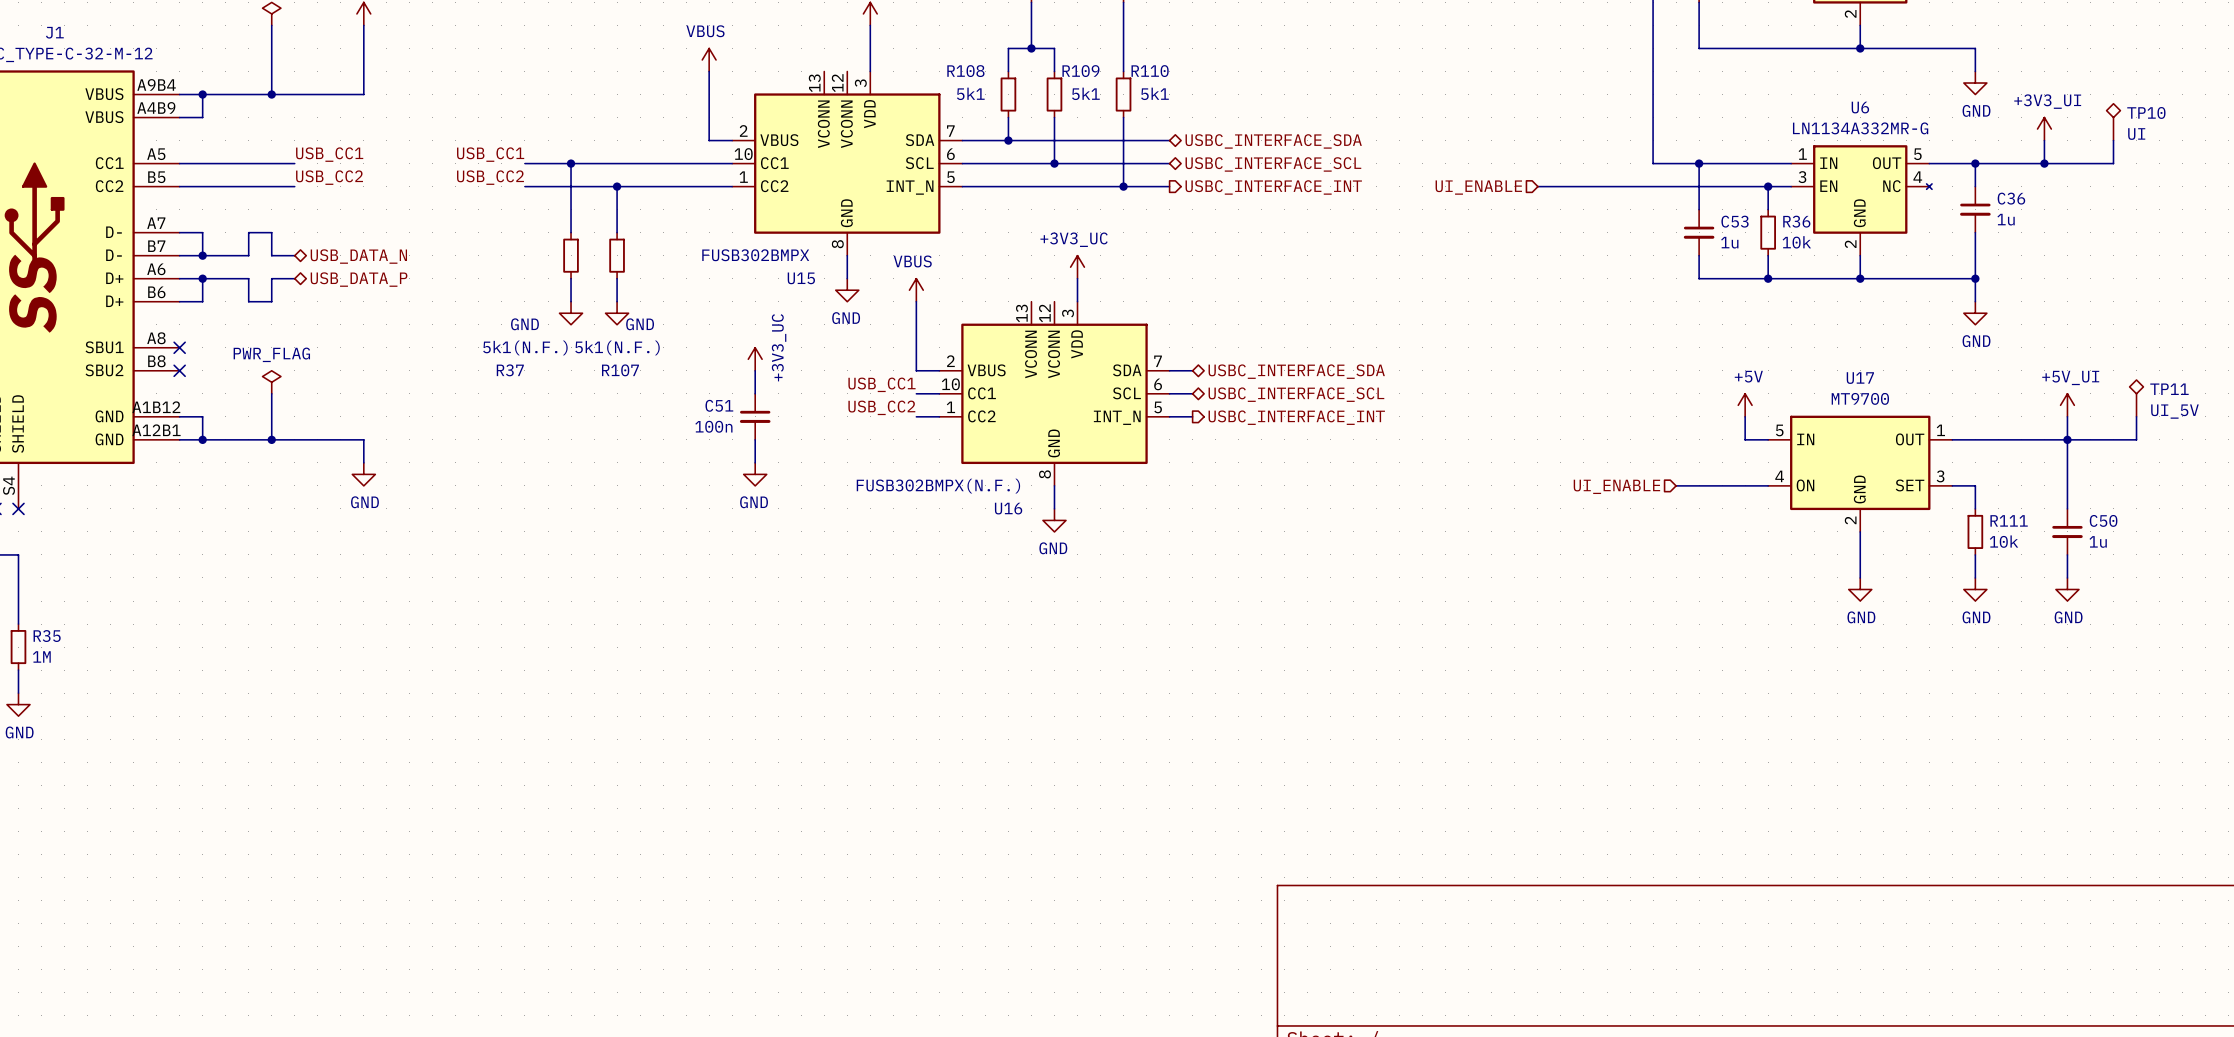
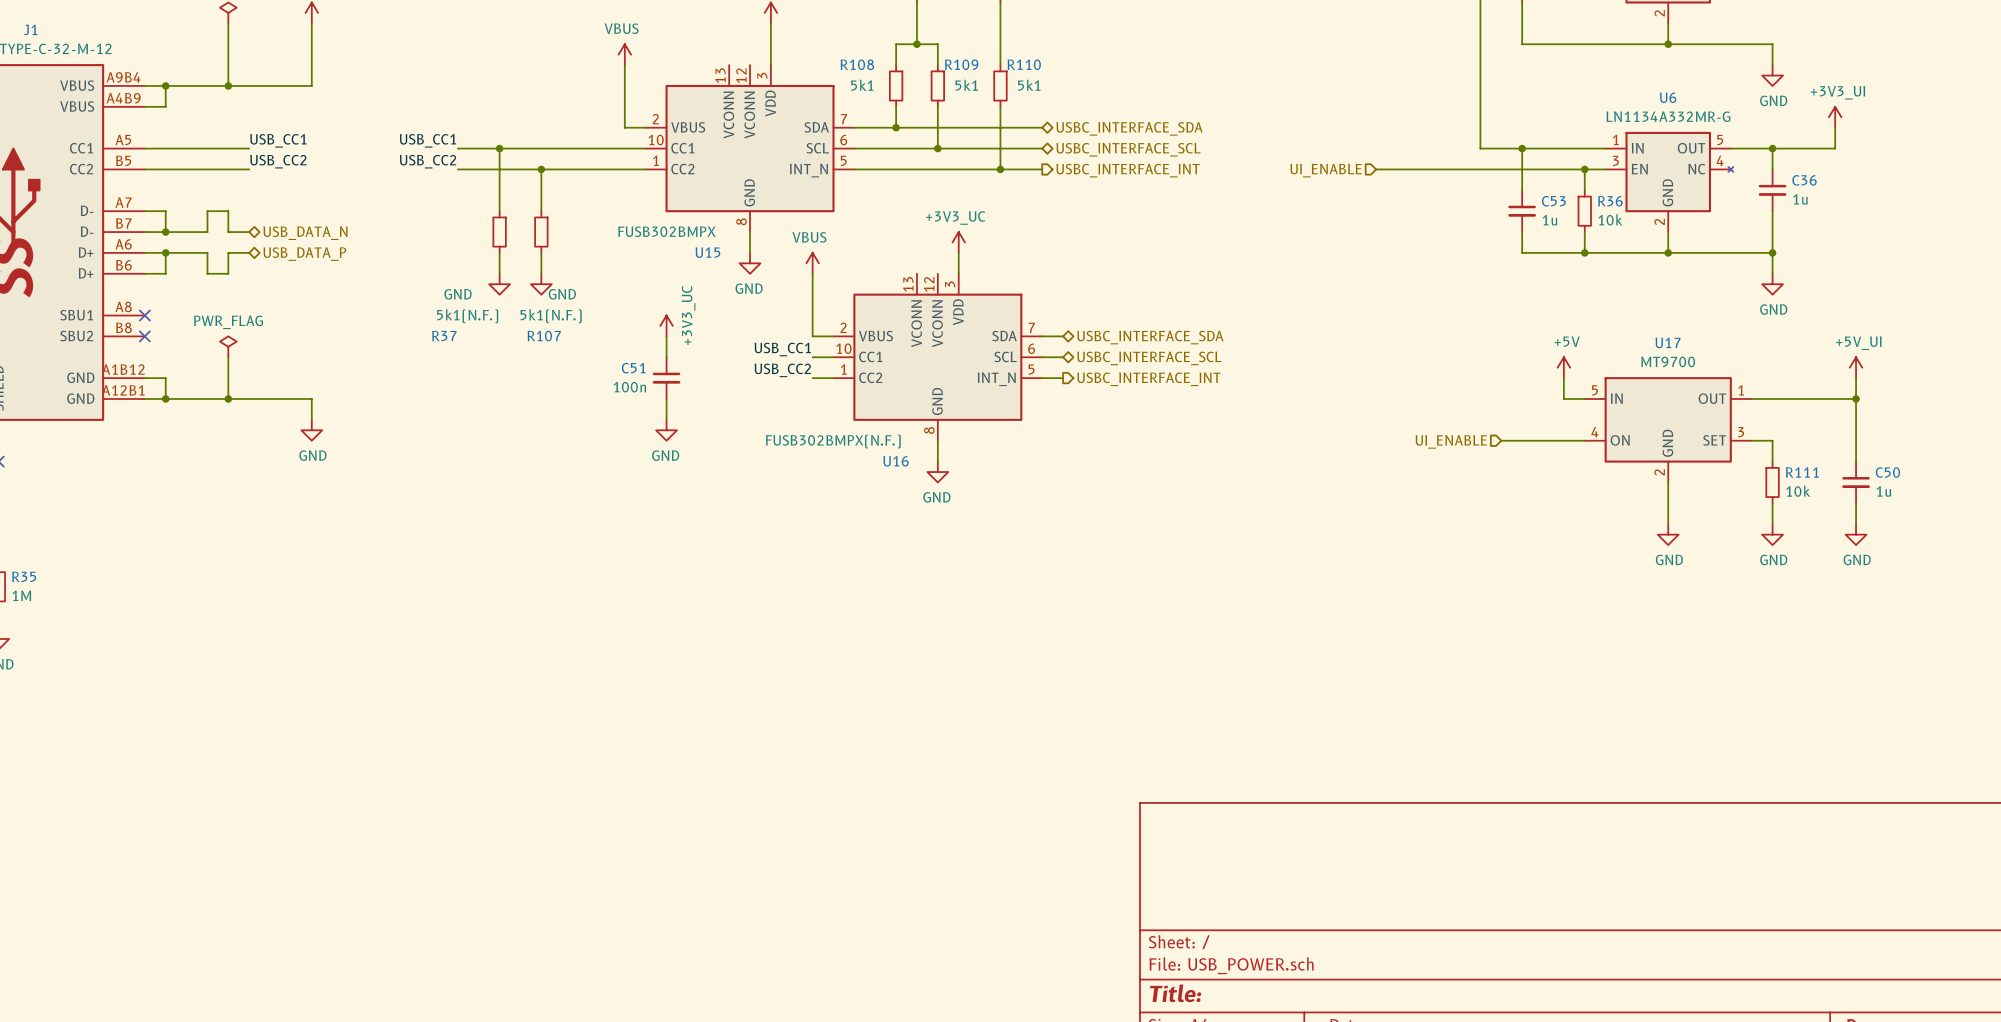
TP10: UI (2113, 122) -> none
wire: (2113, 140) (2113, 163) (2044, 163) -> none
junction: (2044, 163) -> none
TP11: UI_5V (2136, 398) -> none
wire: (2136, 416) (2136, 439) (2067, 439) -> none

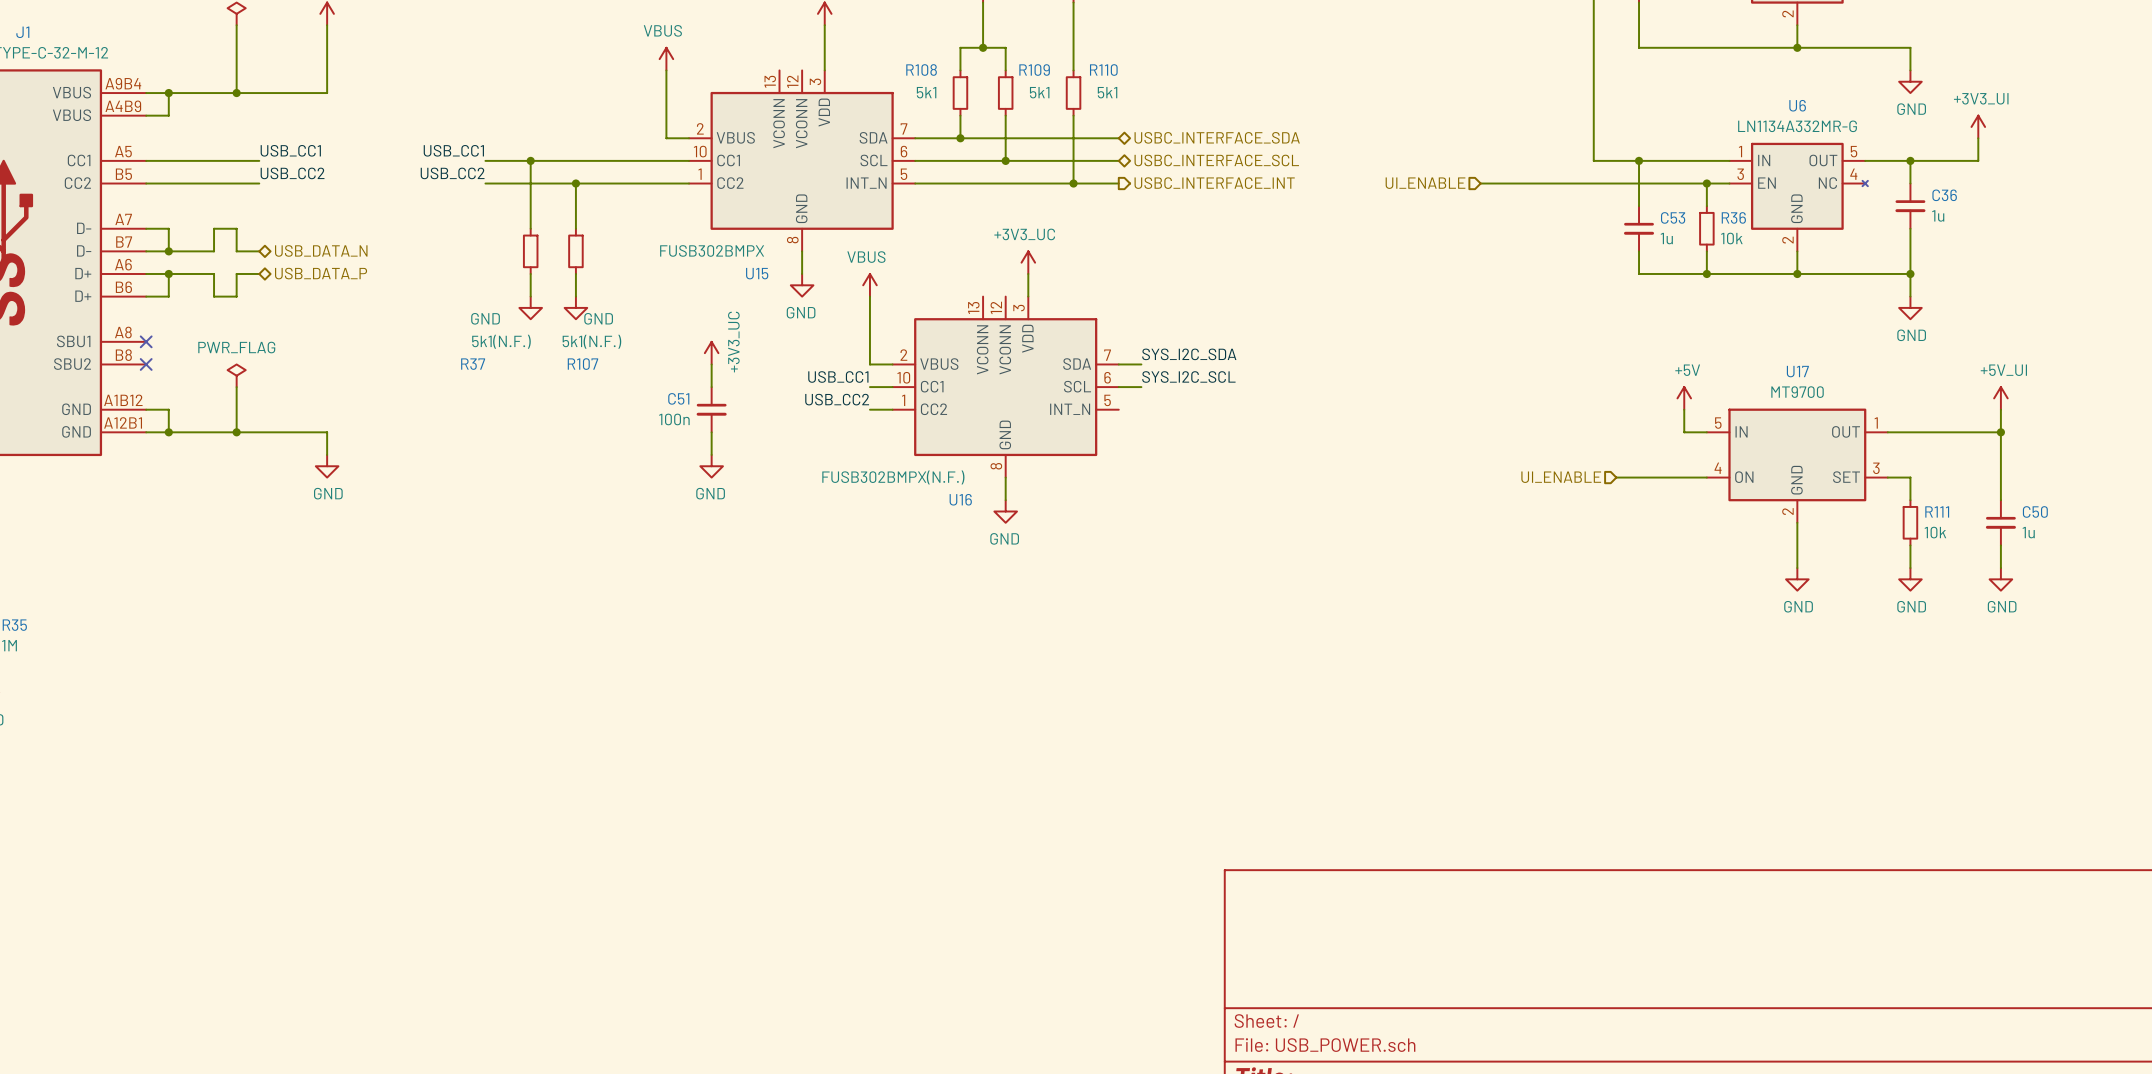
label: none -> SYS_I2C_SDA (1189, 354)
hierarchical label: USBC_INTERFACE_SDA (1150, 337) -> none
label: none -> SYS_I2C_SCL (1188, 377)
hierarchical label: USBC_INTERFACE_SCL (1149, 358) -> none
wire: (1042, 378) (1063, 378) -> none
hierarchical label: USBC_INTERFACE_INT (1148, 379) -> none

